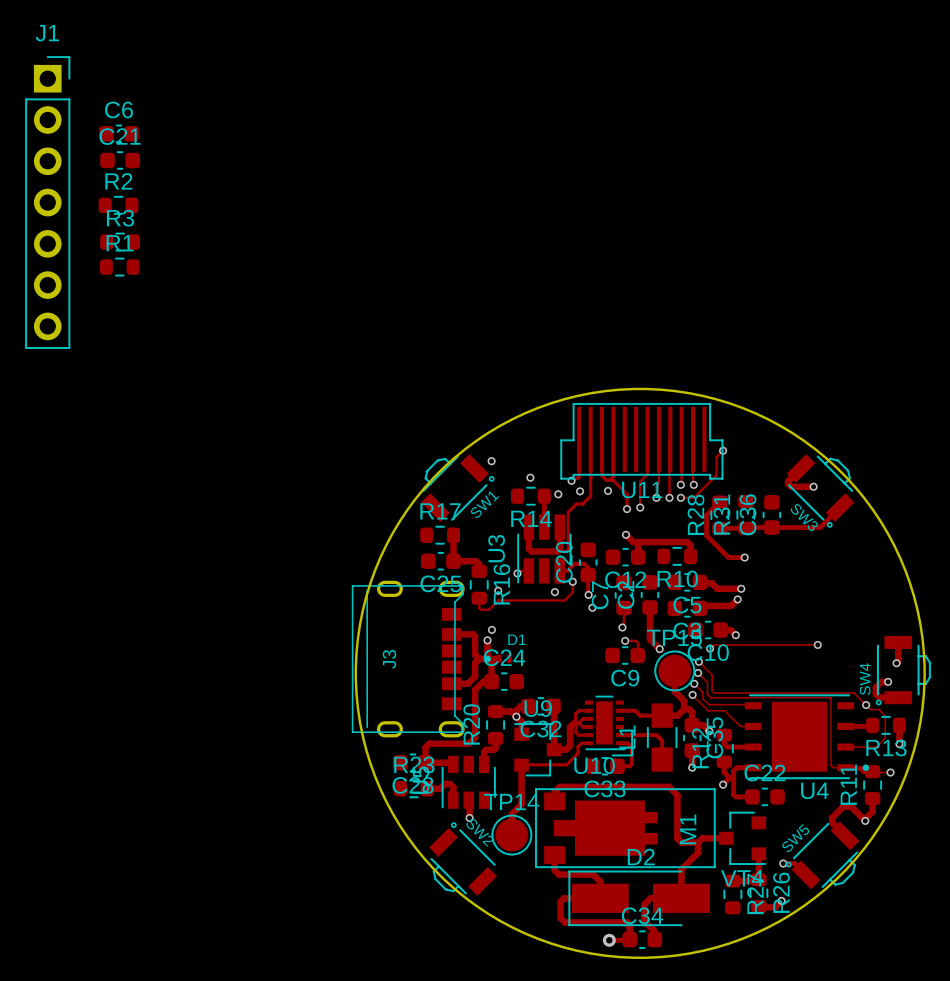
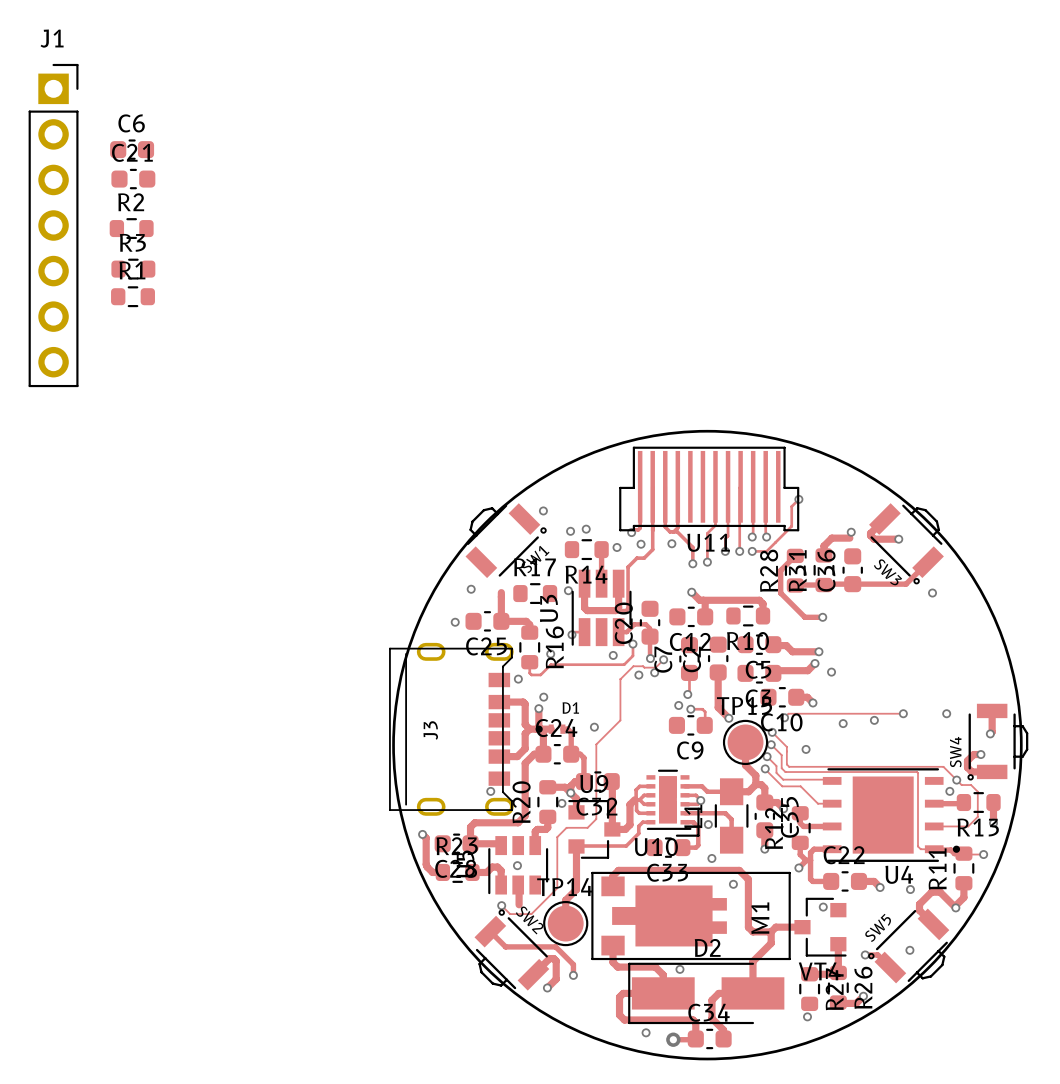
via: none -> (570, 531)
via: none -> (851, 532)
track: none -> (849, 538) (831, 538) (824, 546) (824, 555)
via: none -> (471, 589)
via: none -> (568, 590)
R17 position: (440, 535) -> (535, 593)
via: none -> (932, 593)
via: none -> (455, 622)
track: none -> (663, 659) (655, 667) (633, 666) (620, 679)
via: none -> (663, 659)
via: none -> (831, 672)
via: none -> (638, 675)
via: none -> (518, 679)
track: none -> (620, 679) (620, 720) (596, 744) (596, 819) (587, 827) (566, 827) (557, 837) (557, 888) (531, 914) (510, 914) (501, 905)
via: none -> (678, 705)
via: none -> (946, 713)
via: none -> (874, 720)
via: none -> (843, 723)
via: none -> (594, 727)
track: none -> (562, 729) (567, 729) (571, 732) (571, 754) (580, 754) (583, 757) (583, 781)
via: none -> (806, 749)
via: none -> (490, 791)
via: none -> (949, 791)
track: none -> (685, 795) (695, 795) (699, 798) (697, 804) (685, 804)
via: none -> (700, 800)
via: none -> (561, 803)
via: none -> (708, 824)
track: none -> (422, 834) (426, 838) (427, 867) (432, 872) (442, 872)
via: none -> (422, 834)
via: none -> (711, 858)
via: none -> (517, 865)
track: none -> (858, 881) (874, 881) (880, 887)
via: none -> (733, 884)
via: none -> (880, 887)
via: none -> (910, 889)
via position: (469, 818) -> (501, 905)
via: none -> (823, 907)
track: none -> (490, 931) (505, 946) (555, 946) (573, 964) (573, 975)
via: none -> (909, 950)
via: none -> (679, 969)
track: none -> (533, 974) (549, 958) (553, 958) (556, 961) (556, 979) (547, 987)
via: none -> (573, 975)
via: none -> (547, 987)
via: none -> (807, 1016)
via: none -> (646, 1032)

